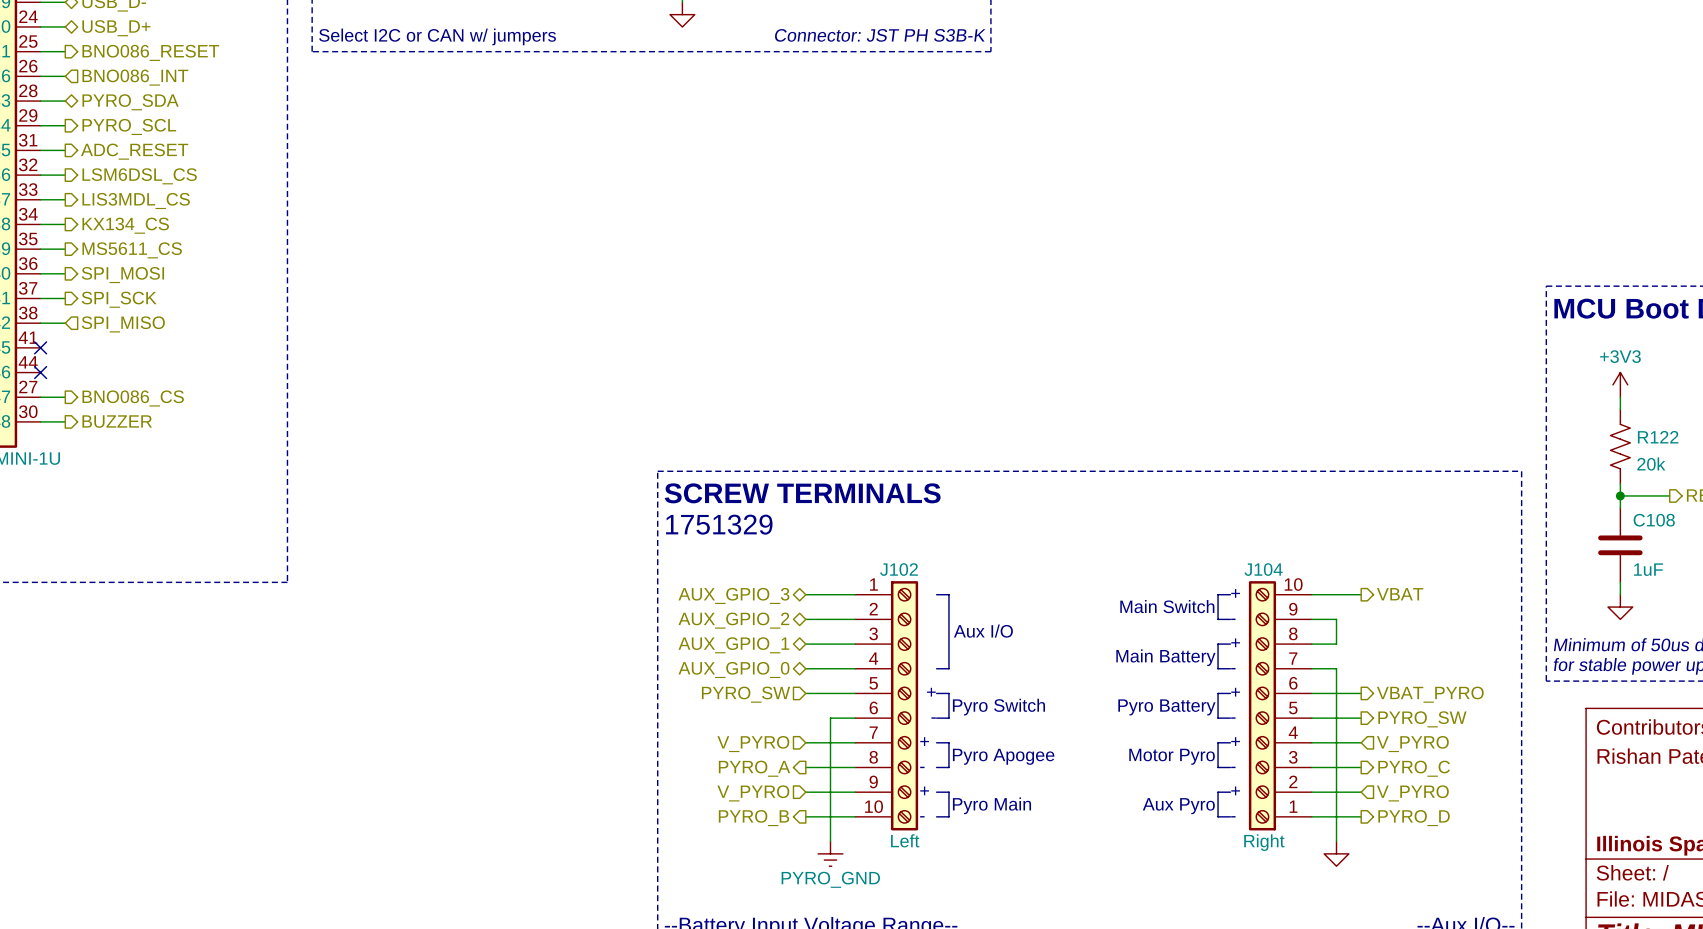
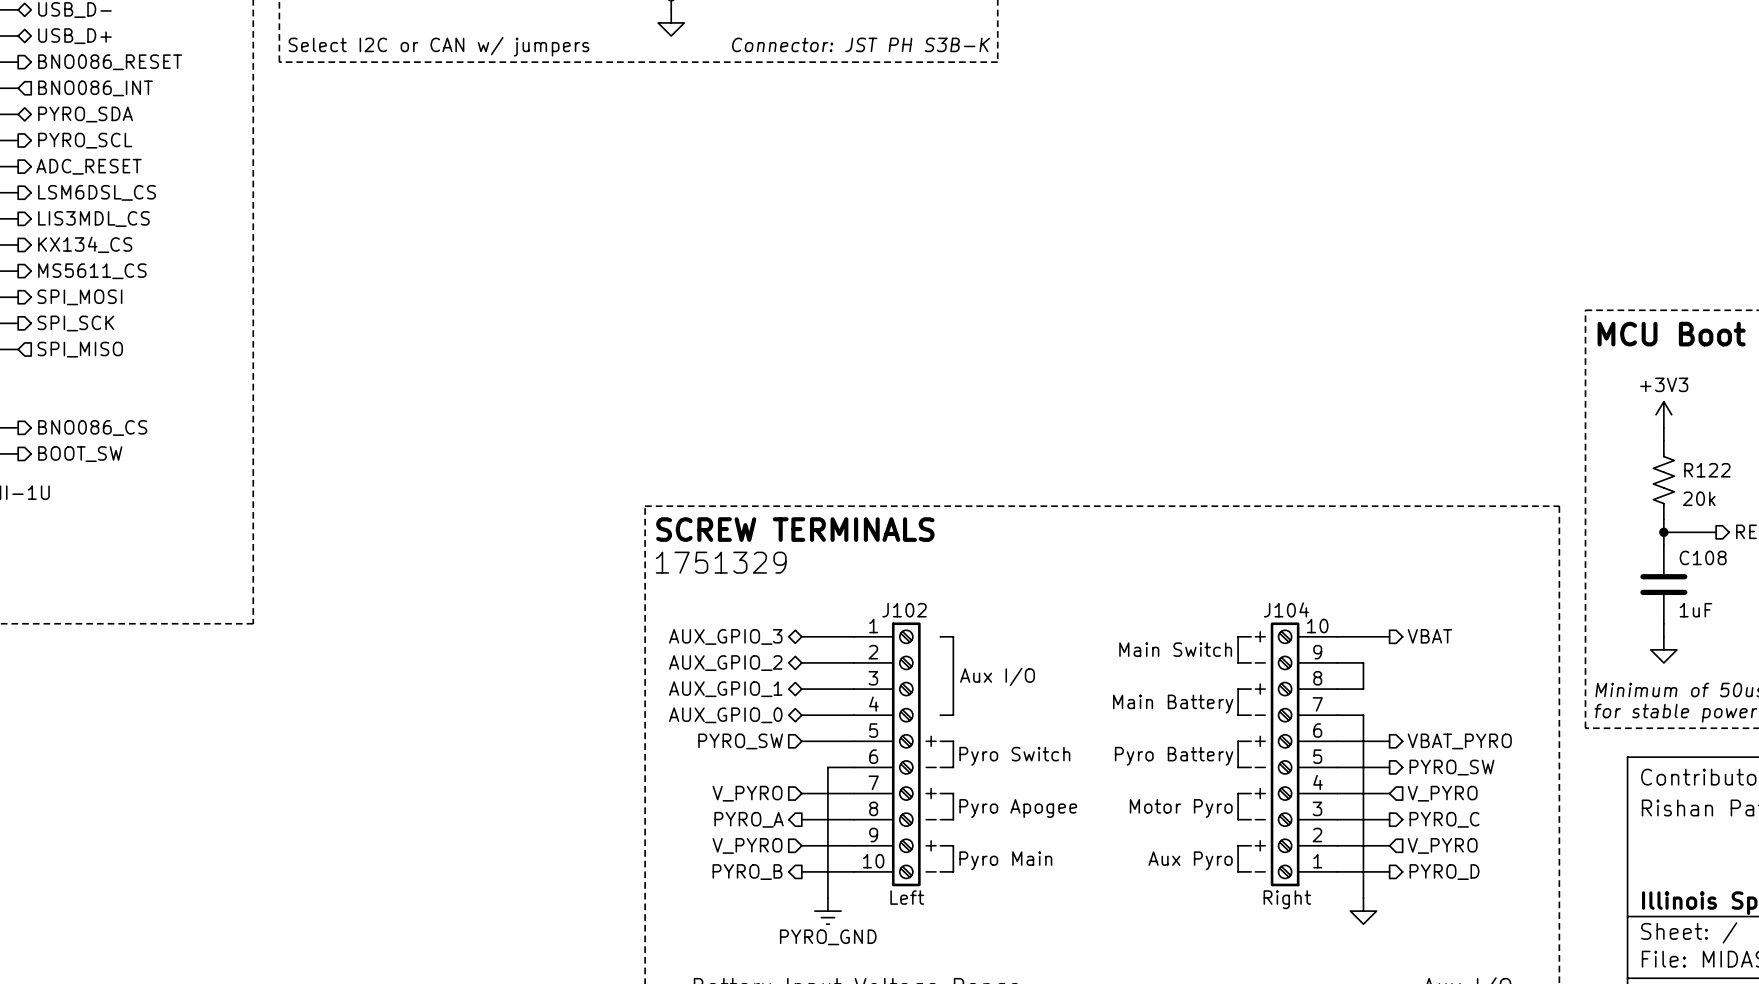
hierarchical label: BUZZER (117, 421) -> BOOT_SW (80, 454)

